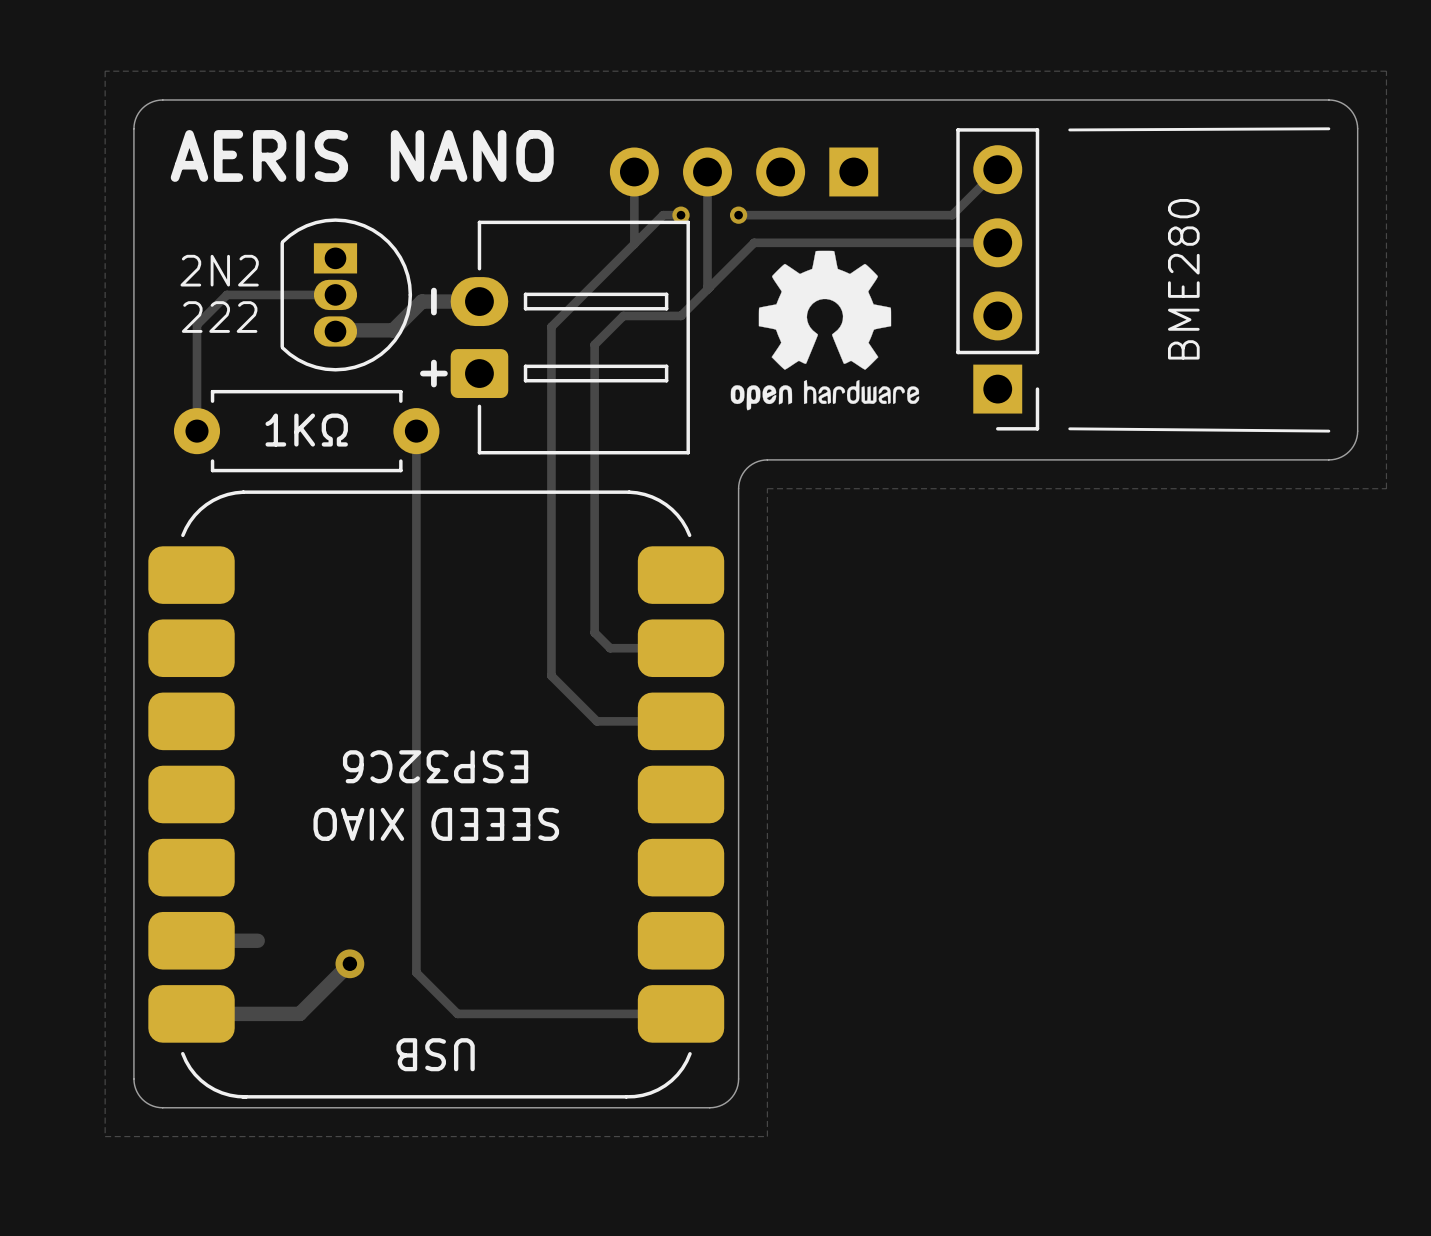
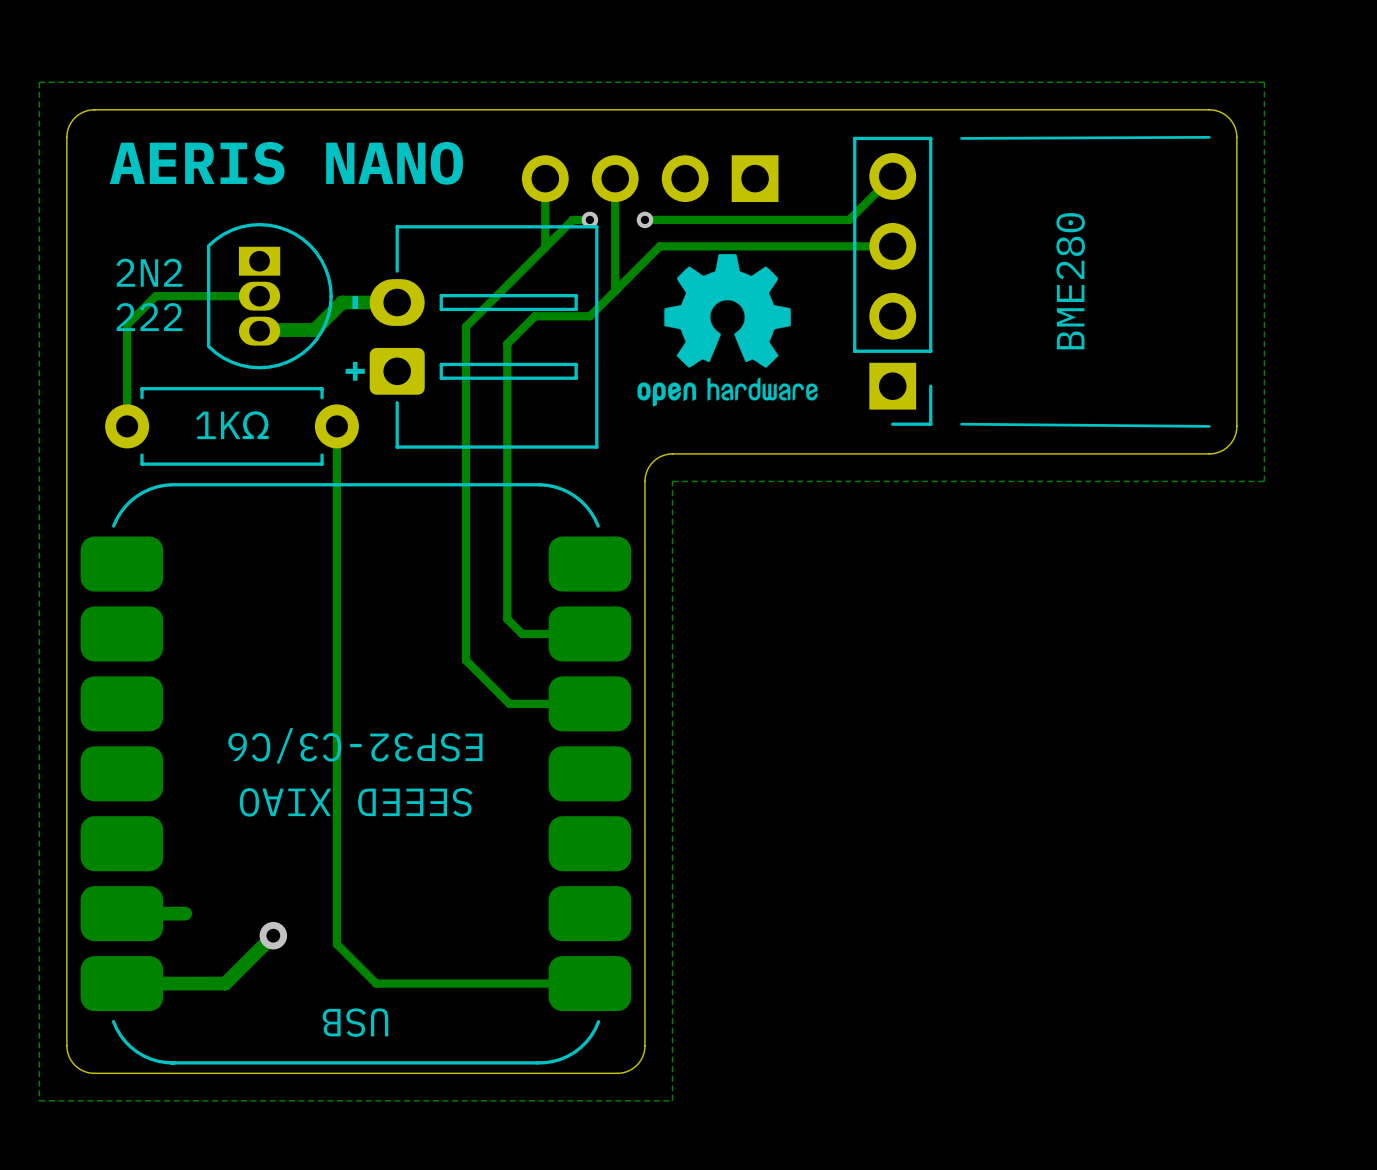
part text: ESP32C6 (435, 766) -> ESP32-C3/C6 (355, 745)

